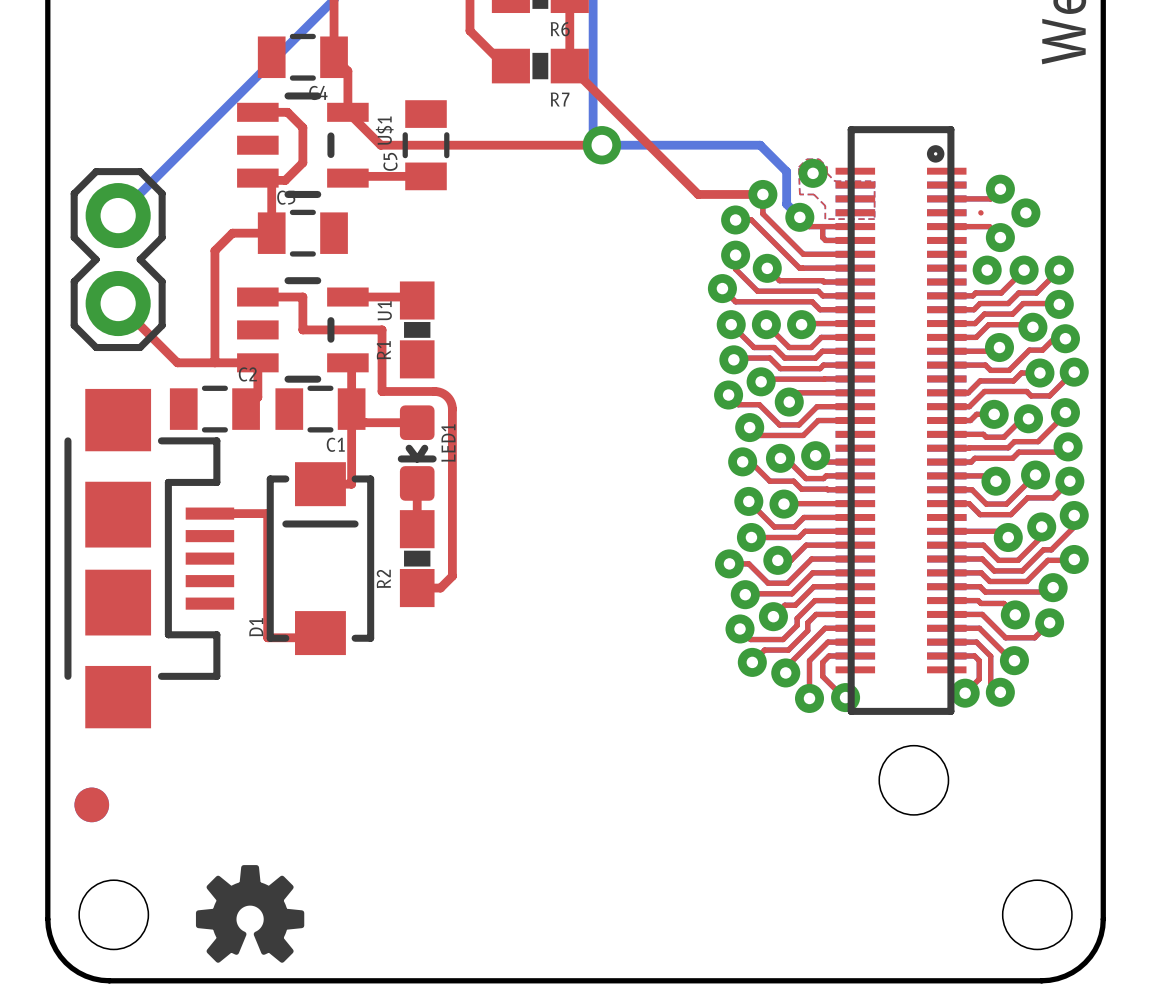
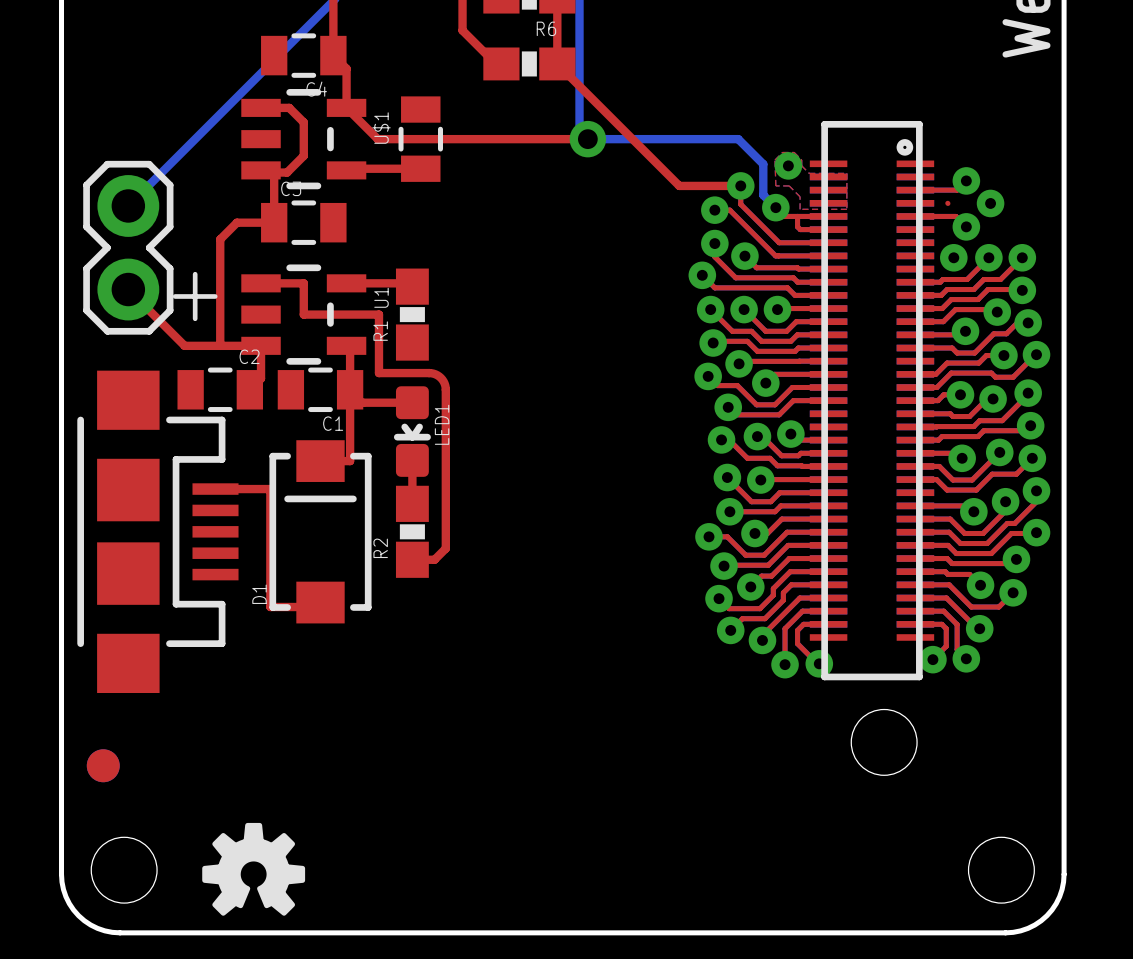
R7 name: R7 (560, 99) -> none
C5 name: C5 (390, 161) -> none
text: none -> + (195, 296)

